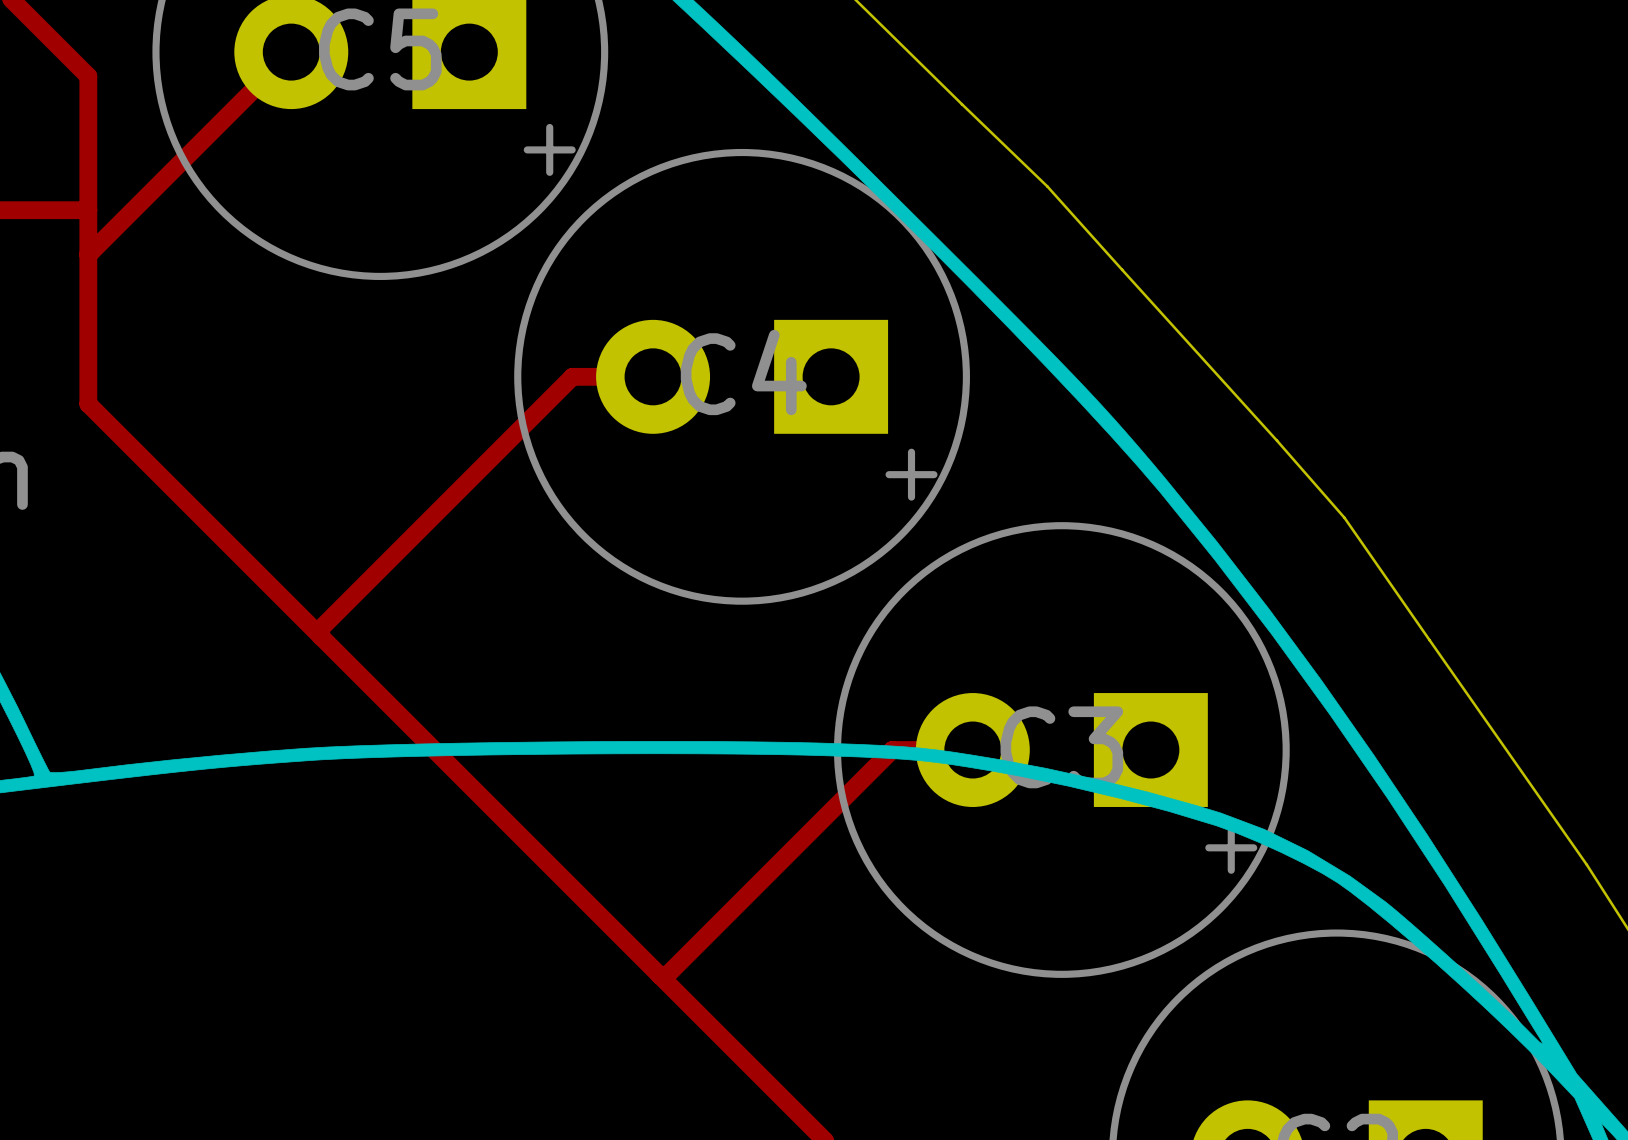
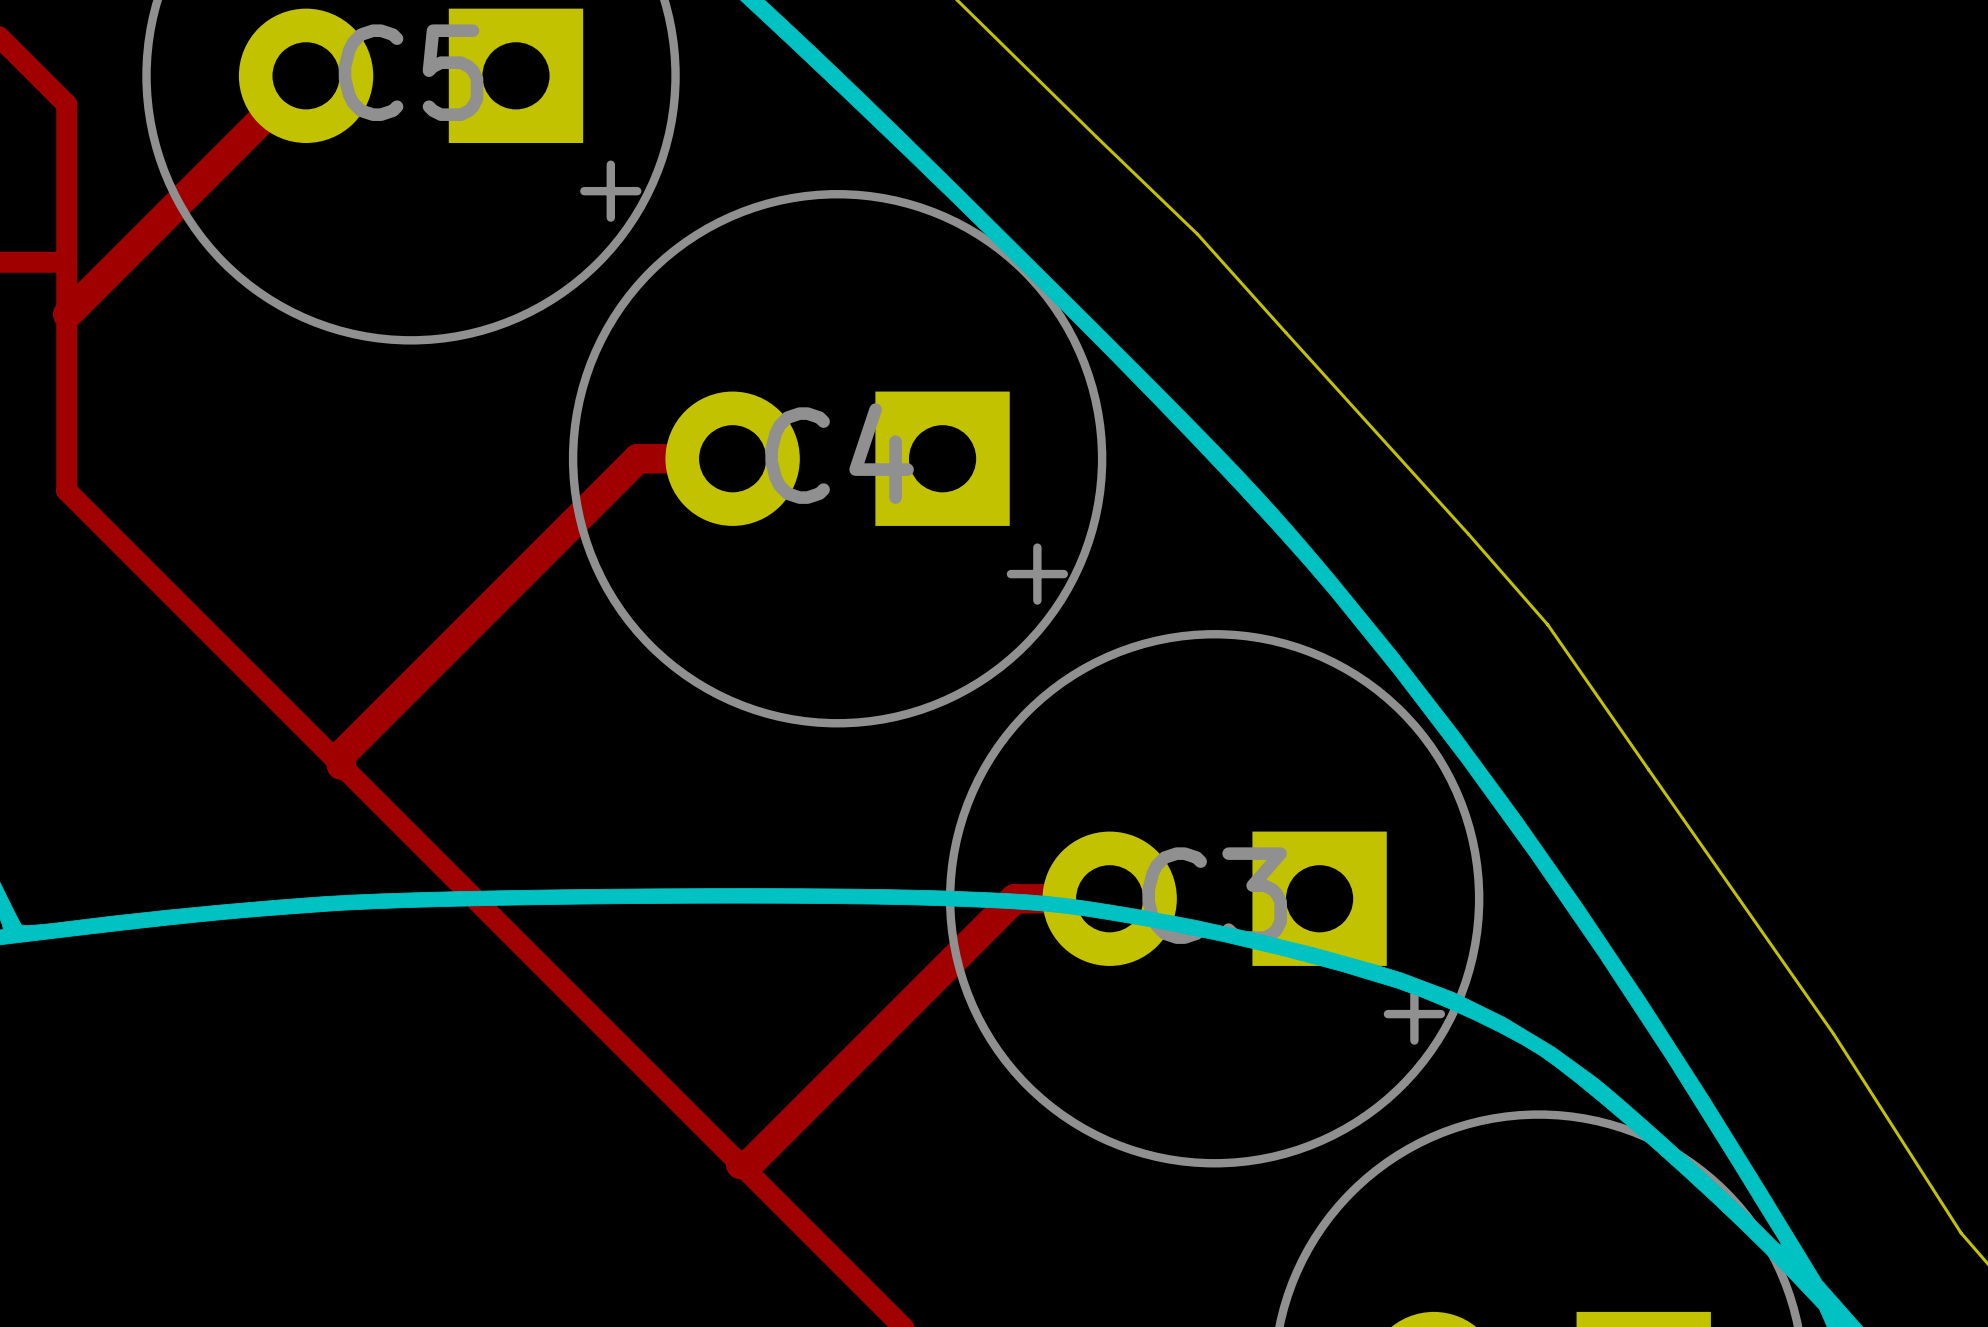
track width: thin (291, 52) (89, 254) -> thick (306, 75) (67, 314)
track width: thin (653, 376) (572, 376) (321, 628) (321, 636) -> thick (732, 458) (637, 458) (341, 755) (341, 765)
track width: thin (972, 750) (892, 750) (666, 975) (659, 975) -> thick (1109, 898) (1014, 898) (748, 1164) (740, 1164)

